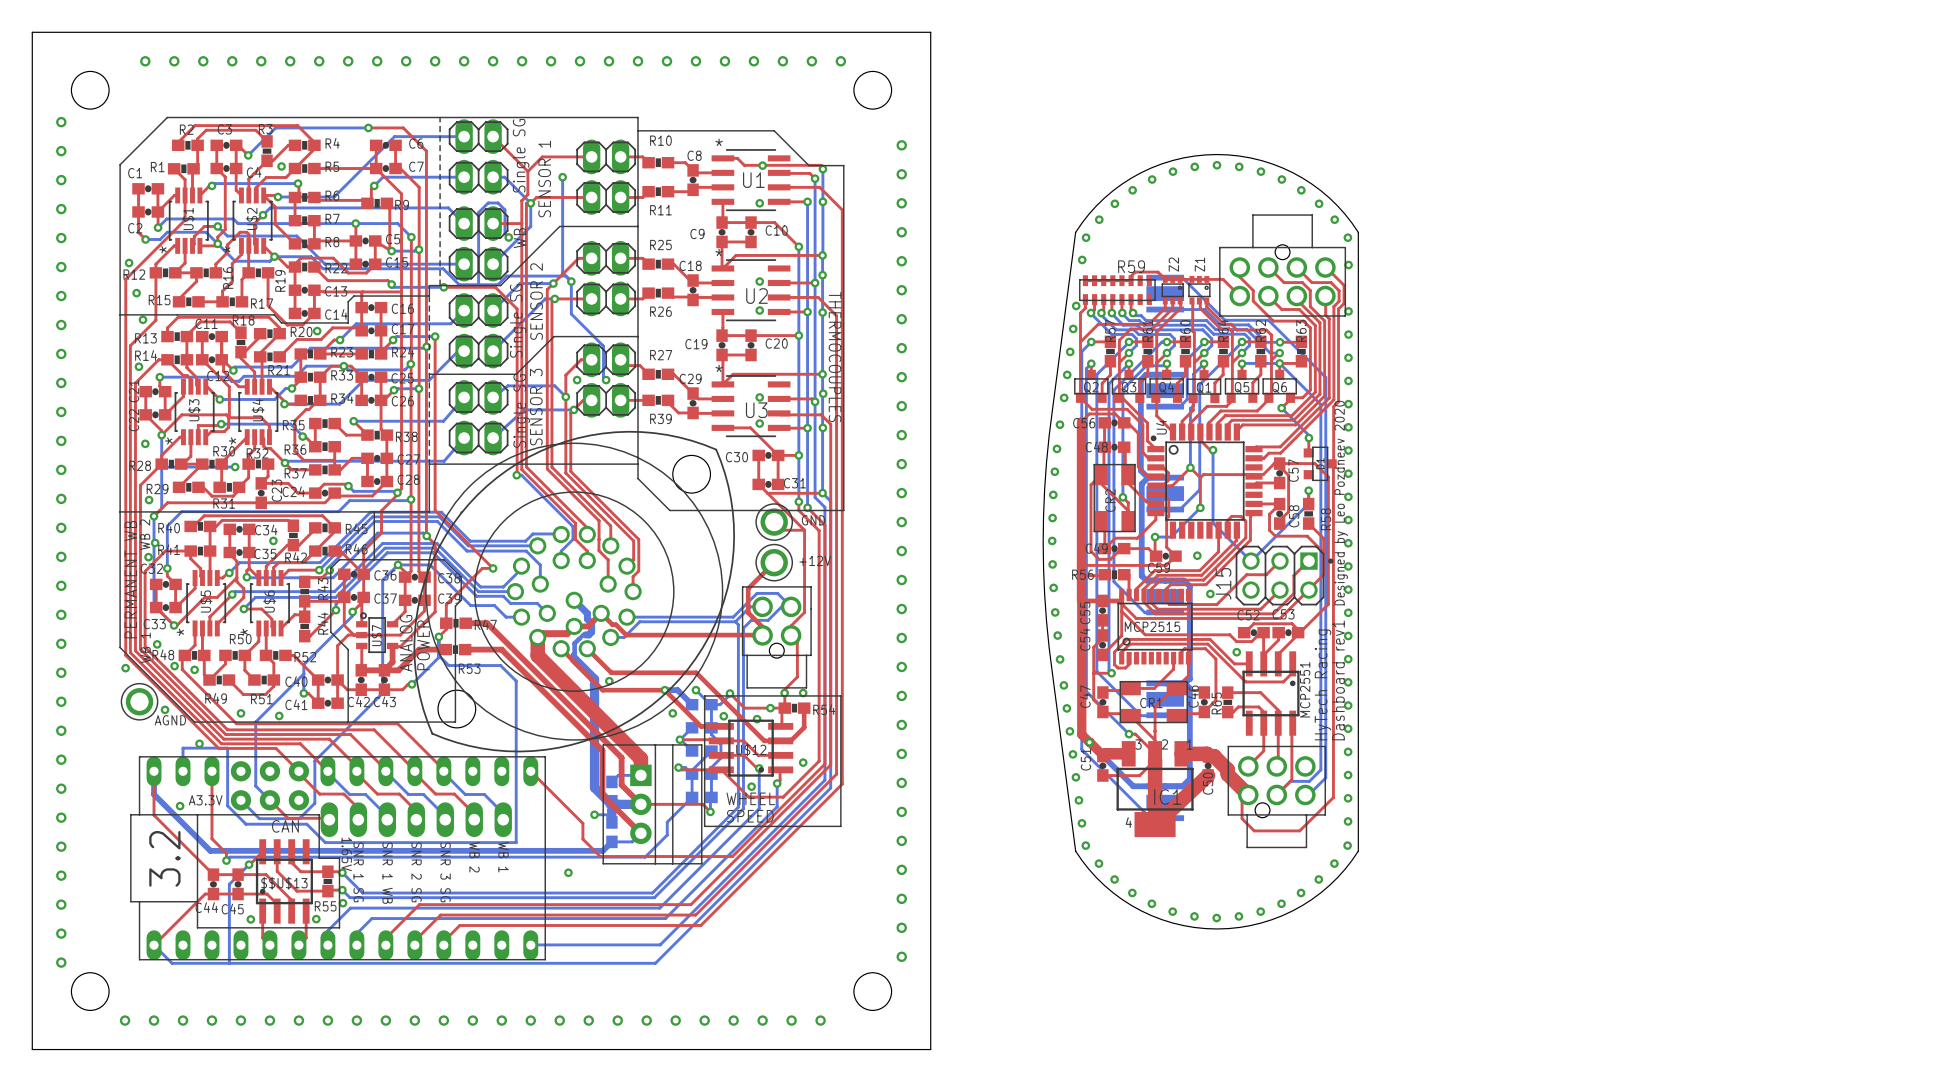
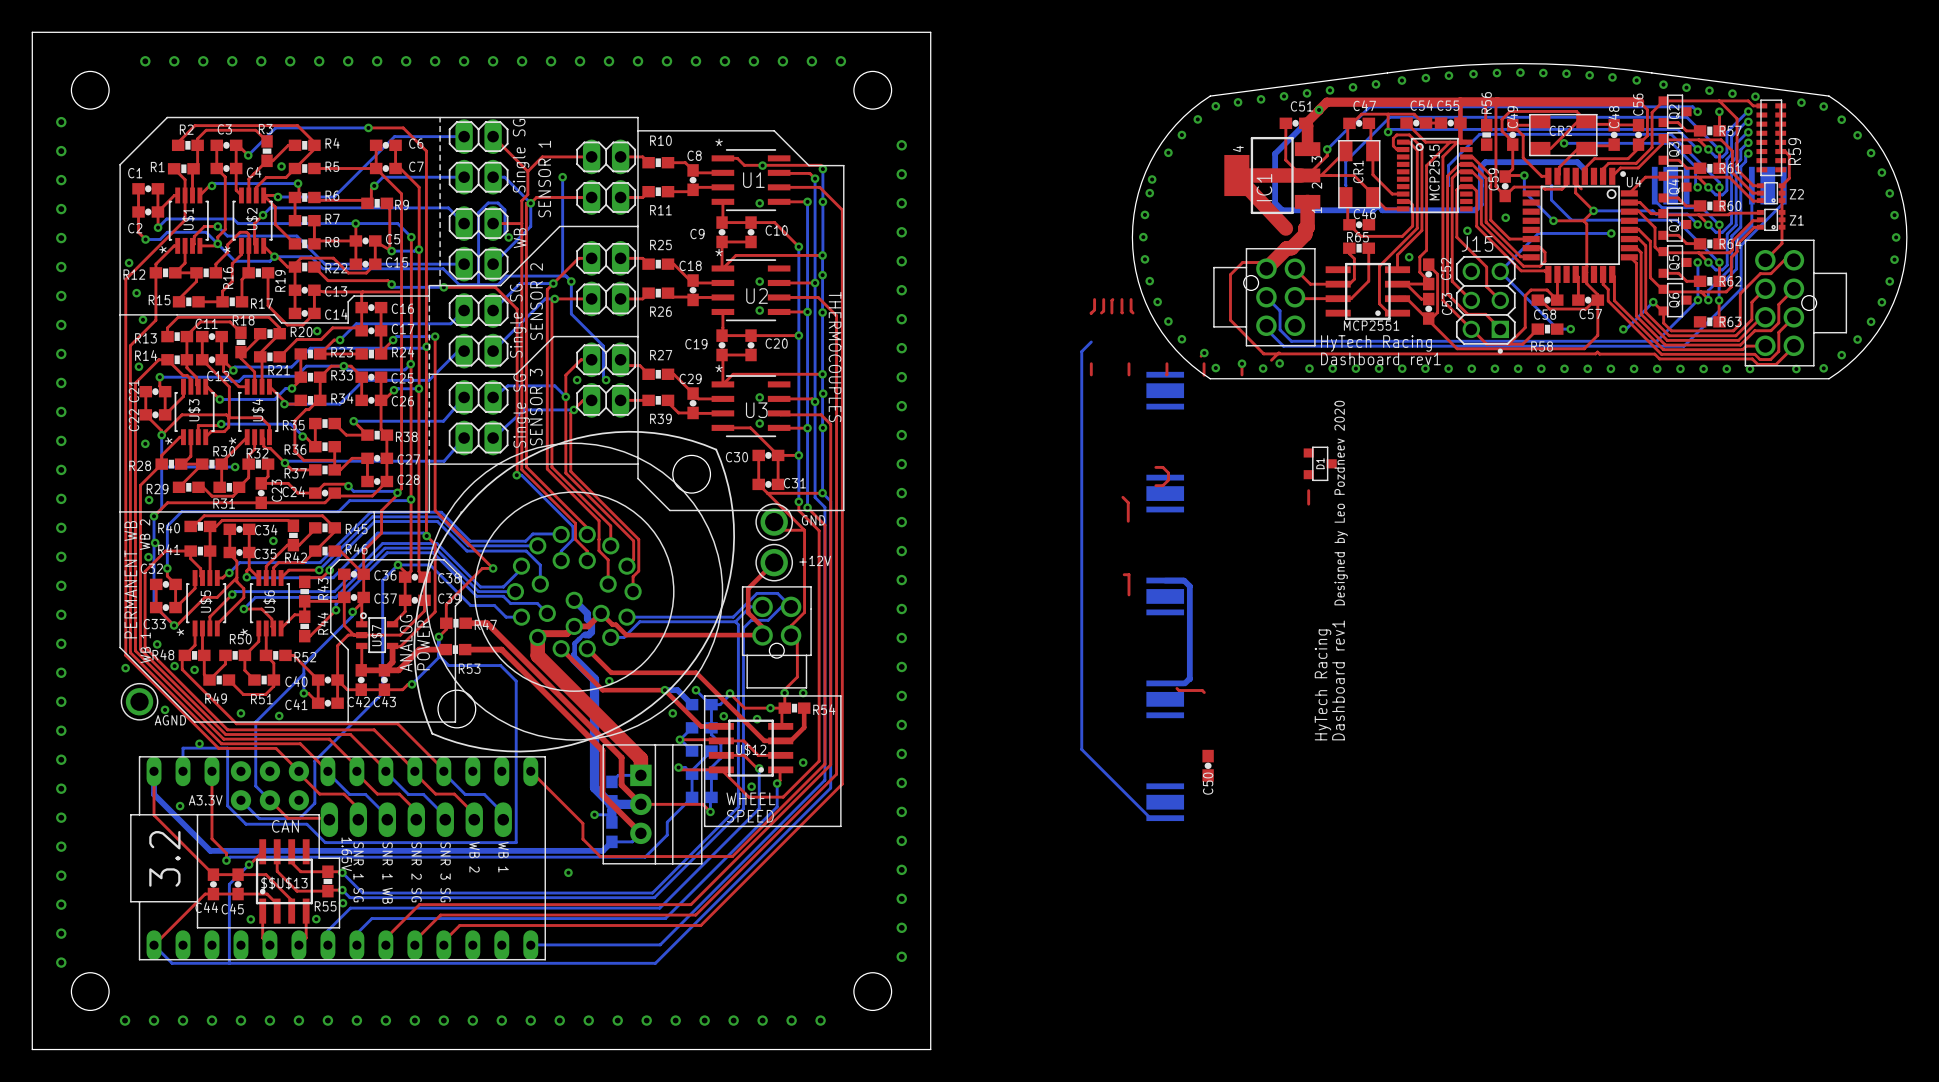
board edge: none -> (1387, 72) (1210, 96) (1183, 116) (1168, 133) (1155, 151) (1141, 182) (1133, 215) (1132, 248) (1135, 270) (1145, 302) (1162, 332) (1183, 358) (1210, 378) (1829, 378) (1847, 365) (1863, 349) (1877, 332) (1888, 313) (1900, 281) (1906, 248) (1906, 226) (1900, 193) (1888, 161) (1877, 142) (1855, 116) (1829, 96) (1625, 69) (1572, 65) (1493, 63) (1387, 72)
via: none -> (1520, 72)
via: none -> (1496, 73)
via: none -> (1543, 73)
via: none -> (1566, 73)
via: none -> (1473, 74)
via: none -> (1448, 75)
via: none -> (1589, 75)
via: none -> (1612, 77)
via: none -> (1425, 78)
via: none -> (1401, 80)
via: none -> (1636, 80)
via: none -> (1375, 84)
via: none -> (1663, 84)
via: none -> (1353, 87)
via: none -> (1686, 87)
via: none -> (1330, 90)
via: none -> (1709, 90)
via: none -> (1307, 93)
via: none -> (1732, 93)
via: none -> (1284, 96)
via: none -> (1755, 96)
via: none -> (1261, 99)
top track: none -> (1719, 100) (1737, 118) (1737, 169) (1753, 185) (1760, 185)
top track: none -> (1485, 101) (1486, 125)
top track: none -> (1497, 101) (1495, 186) (1505, 195) (1514, 187) (1561, 189) (1566, 184) (1566, 176)
via: none -> (1238, 102)
top track: none -> (1460, 102) (1326, 102) (1305, 123) (1307, 125) (1307, 149)
via: none -> (1801, 102)
top track: none -> (1761, 105) (1753, 105) (1748, 100) (1663, 100) (1652, 112) (1652, 147) (1636, 163) (1608, 163) (1603, 169) (1603, 176)
top track: none -> (1780, 105) (1780, 151) (1785, 151) (1789, 155) (1789, 178) (1781, 185) (1781, 243) (1765, 260)
via: none -> (1215, 106)
via: none -> (1823, 106)
bottom track: none -> (1318, 109) (1275, 153) (1275, 203) (1282, 210) (1373, 210) (1378, 205) (1382, 210) (1475, 210) (1480, 204) (1480, 185)
via: none -> (1319, 109)
bottom track: none -> (1697, 111) (1692, 106) (1369, 106) (1327, 149)
via: none -> (1697, 111)
top track: none -> (1719, 111) (1719, 130)
via: none -> (1719, 111)
bottom track: none -> (1748, 111) (1726, 132) (1726, 152) (1722, 156) (1715, 156) (1708, 149)
via: none -> (1748, 111)
top track: none -> (1388, 114) (1388, 132)
via: none -> (1197, 119)
top track: none -> (1502, 119) (1502, 131) (1512, 141) (1512, 169) (1505, 176)
top track: none -> (1502, 119) (1510, 111) (1576, 111) (1589, 124) (1638, 125)
via: none -> (1841, 119)
top track: none -> (1540, 121) (1536, 125) (1512, 125) (1523, 135) (1523, 157) (1541, 176) (1548, 176)
top track: none -> (1586, 121) (1577, 121) (1550, 148)
bottom track: none -> (1748, 121) (1731, 136) (1731, 154) (1726, 159) (1726, 190) (1722, 194) (1715, 194) (1708, 187)
via: none -> (1748, 121)
top track: none -> (1663, 122) (1678, 122) (1686, 130) (1700, 130)
top track: none -> (1285, 123) (1285, 160) (1301, 175) (1236, 175) (1285, 228)
top track: none -> (1368, 123) (1370, 125) (1370, 148) (1372, 151) (1372, 174) (1392, 194) (1403, 194)
top track: none -> (1406, 123) (1425, 142) (1466, 142) (1460, 142)
top track: none -> (1441, 123) (1423, 123) (1414, 114) (1361, 114) (1347, 127) (1347, 148) (1321, 175)
bottom track: none -> (1388, 132) (1390, 129) (1677, 129) (1697, 149)
via: none -> (1388, 132)
bottom track: none -> (1748, 132) (1736, 143) (1736, 157) (1731, 162) (1731, 223) (1722, 232) (1715, 232) (1708, 224)
via: none -> (1748, 132)
via: none -> (1181, 135)
via: none -> (1857, 135)
top track: none -> (1698, 139) (1708, 149)
top track: none -> (1403, 142) (1409, 142) (1417, 150) (1417, 228) (1379, 266) (1379, 303) (1388, 313) (1397, 313)
top track: none -> (1450, 142) (1426, 165) (1426, 250) (1419, 257) (1419, 272) (1428, 281) (1428, 284) (1397, 284)
top track: none -> (1457, 142) (1442, 156) (1442, 300) (1486, 344) (1522, 344) (1537, 329)
top track: none -> (1460, 142) (1460, 101) (1639, 101) (1647, 109) (1647, 135) (1638, 144) (1638, 148) (1628, 158) (1594, 158) (1584, 168) (1584, 176)
bottom track: none -> (1748, 142) (1740, 149) (1740, 159) (1736, 164) (1736, 225) (1727, 234) (1727, 265) (1722, 269) (1715, 269) (1708, 262)
via: none -> (1748, 142)
bottom track: none -> (1564, 143) (1672, 143) (1695, 166) (1695, 185) (1697, 187)
via: none -> (1564, 143)
top track: none -> (1614, 144) (1577, 148) (1559, 167) (1557, 176)
top track: none -> (1327, 149) (1327, 155) (1307, 175) (1321, 175)
via: none -> (1327, 149)
top track: none -> (1403, 149) (1396, 149) (1393, 145) (1393, 138) (1396, 134) (1409, 134) (1421, 147) (1421, 230) (1397, 254) (1397, 269)
via: none -> (1697, 149)
via: none -> (1708, 149)
top track: none -> (1719, 149) (1719, 168)
bottom track: none -> (1719, 149) (1686, 117) (1389, 117) (1345, 161) (1346, 185)
via: none -> (1719, 149)
via: none -> (1168, 152)
bottom track: none -> (1748, 153) (1745, 156) (1745, 161) (1740, 166) (1740, 227) (1731, 236) (1731, 267) (1708, 290) (1708, 300)
via: none -> (1748, 153)
via: none -> (1871, 153)
top track: none -> (1466, 156) (1472, 156) (1490, 175) (1490, 220) (1509, 239) (1531, 239)
top track: none -> (1663, 160) (1678, 160) (1686, 168) (1700, 168)
via: (1216, 165) -> none
via: (1194, 166) -> none
via: (1239, 166) -> none
bottom track: none -> (1583, 168) (1577, 162) (1485, 162) (1480, 166) (1480, 185)
via: (1172, 171) -> none
via: (1260, 171) -> none
via: none -> (1881, 172)
top track: none -> (1321, 175) (1329, 175)
top track: none -> (1330, 175) (1354, 175) (1385, 208) (1403, 208)
top track: none -> (1506, 175) (1524, 175)
bottom track: none -> (1524, 175) (1524, 191) (1553, 220)
via: none -> (1524, 175)
top track: none -> (1575, 176) (1575, 192) (1593, 210) (1583, 220)
top track: none -> (1612, 176) (1620, 167) (1638, 167) (1662, 143) (1663, 138) (1721, 139) (1732, 151) (1732, 172) (1753, 193) (1760, 193)
top track: none -> (1698, 177) (1708, 187)
via: (1281, 179) -> none
top track: none -> (1575, 183) (1581, 188)
bottom track: none -> (1449, 185) (1448, 165) (1479, 134) (1671, 134) (1719, 182) (1719, 187)
bottom track: none -> (1551, 185) (1551, 200) (1571, 220) (1676, 220) (1719, 262)
bottom track: none -> (1654, 185) (1654, 200) (1661, 207) (1701, 207) (1719, 224)
part: none -> (1670, 185)
bottom track: none -> (1751, 185) (1751, 225) (1736, 240) (1736, 269) (1719, 286) (1719, 300)
part: none -> (1767, 185)
bottom track: none -> (1783, 185) (1783, 202) (1741, 245) (1741, 289) (1683, 346) (1283, 346) (1266, 329) (1266, 325)
via: none -> (1697, 187)
via: none -> (1708, 187)
top track: none -> (1719, 187) (1719, 205)
via: none -> (1719, 187)
via: (1132, 190) -> none
via: (1301, 190) -> none
via: none -> (1149, 193)
top track: none -> (1629, 193) (1645, 177) (1729, 177) (1753, 201) (1760, 200)
part: none -> (1771, 193)
via: none -> (1889, 193)
text: none -> Z2 (1796, 194)
top track: none -> (1345, 197) (1347, 199) (1347, 223) (1361, 236) (1402, 236) (1412, 226) (1412, 205) (1409, 201) (1403, 201)
top track: none -> (1663, 197) (1678, 197) (1686, 205) (1700, 205)
top track: none -> (1307, 201) (1307, 227) (1305, 228) (1305, 234) (1291, 248) (1286, 248) (1266, 268) (1259, 262) (1242, 262) (1230, 274) (1230, 320) (1263, 353) (1595, 353) (1597, 352) (1599, 354) (1654, 354) (1659, 358) (1752, 358) (1757, 364) (1776, 364) (1793, 345)
top track: none -> (1629, 202) (1640, 202) (1651, 213) (1664, 214) (1728, 214) (1730, 213) (1760, 212)
via: (1114, 203) -> none
via: (1319, 203) -> none
bottom track: none -> (1593, 210) (1652, 210) (1656, 214) (1687, 214) (1697, 224)
via: none -> (1593, 210)
top track: none -> (1629, 211) (1638, 210) (1655, 227) (1655, 247) (1659, 251) (1664, 252) (1729, 252) (1732, 249) (1732, 241) (1752, 220) (1760, 219)
via: none -> (1144, 214)
top track: none -> (1698, 214) (1705, 221)
via: none -> (1894, 215)
via: none -> (1505, 217)
via: (1099, 219) -> none
via: (1334, 219) -> none
part: none -> (1771, 219)
top track: none -> (1553, 220) (1583, 220)
via: none -> (1553, 220)
top track: none -> (1583, 220) (1586, 223) (1586, 283) (1597, 294) (1597, 335) (1584, 348) (1457, 348) (1427, 319)
text: none -> Z1 (1796, 220)
via: none -> (1697, 224)
via: none -> (1708, 224)
top track: none -> (1719, 224) (1719, 243)
via: none -> (1719, 224)
top track: none -> (1760, 227) (1754, 227) (1737, 244) (1737, 251) (1731, 257) (1731, 286) (1726, 291) (1663, 291) (1663, 289) (1650, 277) (1650, 241) (1638, 229) (1629, 229)
via: none -> (1467, 230)
board edge: (1075, 232) (1049, 435) (1043, 541) (1049, 647) (1075, 851) (1096, 877) (1112, 892) (1131, 905) (1161, 919) (1183, 925) (1205, 928) (1228, 928) (1261, 922) (1292, 910) (1311, 899) (1337, 877) (1358, 851) (1358, 232) (1345, 214) (1329, 198) (1311, 184) (1292, 172) (1272, 163) (1250, 157) (1216, 154) (1194, 156) (1172, 160) (1141, 172) (1121, 184) (1104, 198) (1088, 214) (1075, 232) -> none
bottom track: none -> (1611, 233) (1538, 233) (1500, 271) (1557, 329) (1570, 329)
via: none -> (1611, 233)
top track: none -> (1663, 235) (1678, 235) (1686, 243) (1700, 243)
via: (1086, 237) -> none
via: none -> (1143, 237)
via: (1347, 237) -> none
via: none -> (1896, 237)
top track: none -> (1629, 239) (1638, 238) (1645, 245) (1645, 312) (1669, 335) (1735, 335) (1751, 319) (1751, 302) (1765, 288)
top track: none -> (1349, 248) (1349, 253) (1354, 258) (1354, 279) (1350, 283) (1310, 284) (1294, 268)
top track: none -> (1368, 248) (1368, 281) (1351, 298) (1294, 297)
top track: none -> (1531, 248) (1540, 247) (1545, 252) (1545, 261) (1540, 266) (1523, 266) (1481, 224) (1481, 180) (1472, 171) (1458, 171) (1452, 178) (1452, 281) (1471, 300)
top track: none -> (1629, 248) (1636, 247) (1641, 252) (1641, 314) (1667, 340) (1738, 340) (1761, 317) (1765, 317)
top track: none -> (1698, 252) (1708, 262)
via: none -> (1409, 257)
top track: none -> (1531, 257) (1520, 256) (1486, 222) (1486, 178) (1472, 164) (1459, 164) (1447, 176) (1447, 294) (1467, 314) (1485, 314) (1500, 329)
top track: none -> (1629, 257) (1636, 263) (1636, 316) (1665, 345) (1740, 345) (1754, 330) (1770, 330) (1778, 322) (1778, 304) (1793, 288)
via: (1082, 259) -> none
via: none -> (1144, 259)
via: none -> (1894, 259)
top track: none -> (1793, 260) (1784, 260) (1770, 273) (1760, 273) (1740, 293) (1740, 324) (1733, 330) (1671, 330) (1663, 323) (1663, 310) (1653, 302)
bottom track: none -> (1697, 262) (1697, 300) (1656, 341) (1291, 341) (1280, 329) (1280, 310) (1266, 297)
via: none -> (1697, 262)
via: none -> (1708, 262)
top track: none -> (1719, 262) (1719, 281)
via: none -> (1719, 262)
text: Z2 (1173, 264) -> none
text: Z1 (1199, 264) -> none
part: (1282, 265) -> none
via: (1348, 265) -> none
top track: none -> (1428, 265) (1437, 274) (1437, 312) (1431, 318) (1426, 318) (1405, 297) (1397, 298)
top track: (1239, 267) (1239, 277) (1253, 290) (1253, 301) (1273, 321) (1303, 321) (1310, 327) (1310, 390) (1302, 397) (1290, 397) (1281, 408) -> none
top track: (1268, 267) (1284, 282) (1302, 282) (1310, 290) (1310, 306) (1324, 320) (1324, 396) (1295, 424) (1242, 424) (1236, 432) -> none
top track: (1296, 267) (1311, 282) (1330, 282) (1339, 290) (1339, 301) (1333, 306) (1333, 399) (1280, 453) (1268, 453) (1263, 458) (1253, 458) -> none
top track: (1325, 267) (1344, 285) (1344, 303) (1338, 309) (1338, 401) (1333, 406) (1333, 461) (1331, 463) (1333, 465) (1333, 797) (1299, 830) (1254, 830) (1242, 818) (1242, 801) (1248, 794) (1227, 774) (1227, 769) (1214, 756) (1208, 756) (1207, 753) (1181, 753) -> none
top track: none -> (1663, 273) (1678, 273) (1686, 281) (1700, 281)
top track: none -> (1548, 274) (1544, 270) (1521, 270) (1476, 226) (1476, 191) (1472, 186) (1460, 186) (1456, 190) (1456, 237) (1486, 267) (1486, 286) (1500, 300)
top track: none -> (1557, 274) (1557, 299) (1547, 289) (1531, 289) (1525, 295) (1525, 327) (1508, 344)
top track: none -> (1575, 274) (1578, 277) (1578, 300)
top track: none -> (1603, 274) (1603, 284) (1608, 289) (1608, 301) (1661, 354) (1754, 354) (1760, 359) (1770, 359) (1778, 351) (1778, 332) (1793, 317)
top track: none -> (1612, 274) (1614, 276) (1614, 300) (1663, 349) (1742, 349) (1746, 346) (1765, 345)
bottom track: (1165, 277) (1182, 277) (1224, 320) (1268, 320) (1325, 377) (1325, 777) (1308, 794) (1305, 794) -> none
top track: (1085, 280) (1131, 280) (1131, 276) (1135, 272) (1158, 272) (1165, 279) (1223, 279) (1239, 296) -> none
via: none -> (1149, 281)
via: none -> (1889, 281)
top track: none -> (1397, 284) (1406, 284) (1421, 299) (1428, 299)
R59 rotation: 0° (1117, 290) -> 90° clockwise (1771, 137)
R59 position: (1117, 290) -> (1771, 137)
part: (1172, 290) -> none
part: (1199, 290) -> none
part: none -> (1367, 291)
top track: none -> (1701, 291) (1708, 300)
part: (1165, 293) -> none
top track: (1268, 296) (1281, 309) (1299, 309) (1315, 325) (1315, 392) (1291, 415) (1225, 415) (1217, 423) (1218, 432) -> none
top track: (1296, 296) (1296, 299) (1319, 322) (1319, 394) (1293, 420) (1232, 420) (1227, 424) (1227, 432) -> none
top track: (1325, 296) (1325, 315) (1329, 318) (1329, 397) (1280, 446) (1256, 446) (1253, 449) -> none
part: none -> (1264, 297)
top track: (1085, 299) (1085, 308) (1080, 313) (1080, 397) (1092, 409) (1127, 409) (1142, 425) (1142, 452) (1148, 458) (1155, 458) -> none
top track: none -> (1537, 300) (1540, 300) (1549, 309) (1586, 309) (1594, 300) (1597, 300)
via: none -> (1697, 300)
via: none -> (1708, 300)
top track: none -> (1719, 300) (1719, 321)
via: none -> (1719, 300)
via: none -> (1157, 301)
top track: (1165, 301) (1165, 307) (1148, 324) (1098, 324) (1080, 342) -> none
top track: (1172, 301) (1172, 308) (1152, 328) (1130, 328) (1119, 340) (1118, 397) (1123, 398) (1147, 423) (1147, 440) (1155, 449) -> none
top track: (1180, 301) (1180, 308) (1156, 332) (1156, 415) (1172, 432) -> none
top track: (1191, 301) (1192, 331) (1194, 332) (1194, 396) (1193, 410) (1182, 421) (1182, 432) -> none
top track: (1199, 301) (1200, 308) (1220, 328) (1229, 328) (1232, 331) (1232, 396) (1231, 401) (1226, 406) (1207, 406) (1190, 423) (1191, 432) -> none
top track: (1206, 301) (1206, 306) (1224, 324) (1231, 324) (1237, 330) (1266, 330) (1271, 335) (1271, 397) (1268, 397) (1257, 411) (1220, 411) (1208, 423) (1209, 432) -> none
bottom track: none -> (1653, 302) (1626, 329) (1623, 329)
via: none -> (1653, 302)
via: none -> (1881, 302)
part: none -> (1795, 303)
via: (1076, 305) -> none
bottom track: (1165, 309) (1205, 309) (1220, 324) (1248, 324) (1266, 342) (1279, 342) -> none
via: (1348, 311) -> none
bottom track: (1091, 313) (1111, 334) (1132, 334) (1136, 338) (1136, 345) (1128, 353) -> none
via: (1091, 313) -> none
bottom track: (1101, 313) (1116, 329) (1134, 329) (1138, 334) (1170, 334) (1174, 338) (1174, 345) (1166, 353) -> none
via: (1101, 313) -> none
bottom track: (1111, 313) (1123, 325) (1137, 325) (1142, 329) (1202, 329) (1211, 338) (1211, 345) (1204, 353) -> none
via: (1111, 313) -> none
bottom track: (1122, 313) (1129, 320) (1139, 320) (1143, 325) (1204, 325) (1213, 334) (1244, 334) (1249, 338) (1249, 345) (1242, 353) -> none
via: (1122, 313) -> none
bottom track: (1133, 313) (1135, 315) (1141, 315) (1146, 320) (1206, 320) (1215, 329) (1246, 329) (1270, 353) (1279, 353) -> none
via: (1133, 313) -> none
via: none -> (1168, 321)
via: none -> (1871, 321)
text: none -> MCP2551 (1371, 325)
via: (1073, 328) -> none
via: none -> (1570, 329)
via: none -> (1623, 329)
via: (1348, 334) -> none
via: none -> (1181, 339)
via: none -> (1857, 339)
top track: (1091, 341) (1110, 341) -> none
top track: (1129, 341) (1147, 341) -> none
top track: (1167, 341) (1185, 341) -> none
top track: (1204, 341) (1223, 341) -> none
top track: (1242, 341) (1260, 341) -> none
top track: (1301, 341) (1279, 342) -> none
via: (1091, 342) -> none
bottom track: (1128, 342) (1096, 374) (1096, 671) (1141, 715) (1165, 715) -> none
via: (1128, 342) -> none
bottom track: (1166, 342) (1162, 342) (1113, 390) (1113, 581) (1145, 612) (1165, 612) -> none
via: (1166, 342) -> none
bottom track: (1204, 342) (1187, 359) (1187, 399) (1179, 407) (1165, 406) -> none
via: (1204, 342) -> none
bottom track: (1242, 342) (1199, 384) (1199, 489) (1179, 509) (1165, 509) -> none
via: (1242, 342) -> none
via: (1279, 342) -> none
text: none -> HyTech Racing (1376, 343)
via: (1070, 351) -> none
R57 rotation: 0° (1110, 351) -> 90° clockwise (1709, 130)
R57 position: (1110, 351) -> (1709, 130)
R61 rotation: 0° (1147, 351) -> 90° clockwise (1709, 168)
R61 position: (1147, 351) -> (1709, 168)
R60 rotation: 0° (1185, 351) -> 90° clockwise (1709, 205)
R60 position: (1185, 351) -> (1709, 205)
R64 rotation: 0° (1223, 351) -> 90° clockwise (1709, 243)
R64 position: (1223, 351) -> (1709, 243)
R62 rotation: 0° (1260, 351) -> 90° clockwise (1709, 281)
R62 position: (1260, 351) -> (1709, 281)
R63 rotation: 0° (1301, 351) -> 90° clockwise (1709, 321)
R63 position: (1301, 351) -> (1709, 321)
top track: (1128, 353) (1119, 362) -> none
via: (1128, 353) -> none
top track: (1166, 353) (1156, 363) -> none
via: (1166, 353) -> none
top track: (1242, 353) (1232, 362) -> none
via: (1242, 353) -> none
via: (1279, 353) -> none
via: none -> (1841, 355)
top track: (1200, 356) (1194, 362) -> none
via: (1348, 357) -> none
text: none -> Dashboard rev1 (1380, 358)
top track: (1110, 361) (1110, 375) (1102, 383) (1102, 397) -> none
top track: (1147, 361) (1147, 374) (1139, 382) (1139, 397) -> none
top track: (1185, 361) (1185, 375) (1177, 383) (1177, 397) -> none
top track: (1223, 361) (1223, 374) (1214, 383) (1214, 398) -> none
top track: (1260, 361) (1260, 374) (1252, 382) (1252, 397) -> none
top track: (1301, 361) (1299, 363) (1279, 363) (1279, 374) -> none
bottom track: (1091, 363) (1086, 368) (1086, 691) (1128, 734) -> none
via: (1091, 363) -> none
bottom track: (1128, 363) (1108, 383) (1108, 670) (1111, 673) -> none
via: (1128, 363) -> none
bottom track: (1166, 363) (1164, 365) (1146, 365) (1122, 389) (1122, 497) -> none
via: (1166, 363) -> none
bottom track: (1204, 363) (1193, 374) (1193, 405) (1190, 408) (1190, 467) -> none
via position: (1204, 363) -> (1215, 368)
bottom track: (1242, 363) (1279, 363) (1320, 404) (1320, 769) (1309, 781) (1290, 781) (1276, 794) -> none
via: none -> (1263, 368)
via: none -> (1309, 368)
via: none -> (1332, 368)
via: none -> (1355, 368)
via: none -> (1379, 368)
via: none -> (1402, 368)
via: none -> (1425, 368)
via: none -> (1448, 368)
via: none -> (1471, 368)
via: none -> (1494, 368)
via: none -> (1518, 368)
via: none -> (1541, 368)
via: none -> (1564, 368)
via: none -> (1587, 368)
via: none -> (1610, 368)
via: none -> (1634, 368)
via: none -> (1657, 368)
via: none -> (1680, 368)
via: none -> (1703, 368)
via: none -> (1726, 368)
via: none -> (1750, 368)
via: none -> (1823, 368)
via: none -> (1796, 369)
via: (1067, 374) -> none
bottom track: (1165, 374) (1146, 374) (1140, 379) (1140, 470) (1147, 477) (1165, 477) -> none
via: (1348, 380) -> none
Q2 rotation: 0° (1091, 386) -> 90° clockwise (1675, 111)
Q2 position: (1091, 386) -> (1675, 111)
Q3 rotation: 0° (1128, 386) -> 90° clockwise (1675, 149)
Q3 position: (1128, 386) -> (1675, 149)
Q4 rotation: 0° (1166, 386) -> 90° clockwise (1675, 187)
Q4 position: (1166, 386) -> (1675, 187)
Q1 rotation: 0° (1204, 386) -> 90° clockwise (1674, 224)
Q1 position: (1204, 386) -> (1674, 224)
Q5 rotation: 0° (1242, 386) -> 90° clockwise (1675, 262)
Q5 position: (1242, 386) -> (1675, 262)
Q6 rotation: 0° (1279, 386) -> 90° clockwise (1675, 300)
Q6 position: (1279, 386) -> (1675, 300)
via: (1064, 397) -> none
via: (1348, 404) -> none
bottom track: (1281, 408) (1308, 435) (1308, 438) -> none
via: (1281, 408) -> none
top track: (1104, 422) (1103, 471) (1091, 484) (1091, 551) (1098, 559) -> none
C56 rotation: 0° (1114, 422) -> 90° clockwise (1638, 134)
C56 position: (1114, 422) -> (1638, 134)
via: (1059, 424) -> none
via: (1348, 427) -> none
top track: (1200, 432) (1200, 440) (1210, 450) (1213, 450) -> none
top track: (1308, 438) (1308, 452) -> none
via: (1308, 438) -> none
C48 rotation: 0° (1114, 447) -> 90° clockwise (1614, 134)
C48 position: (1114, 447) -> (1614, 134)
top track: (1124, 447) (1128, 483) (1146, 501) (1155, 503) -> none
via: (1056, 448) -> none
bottom track: (1213, 450) (1213, 523) (1251, 561) (1308, 503) (1308, 490) -> none
via: (1213, 450) -> none
via: (1348, 450) -> none
top track: (1279, 463) (1279, 466) (1288, 475) (1288, 511) (1279, 520) (1279, 523) -> none
via: (1190, 467) -> none
via: (1054, 471) -> none
C57 rotation: 0° (1279, 473) -> 90° clockwise (1588, 300)
C57 position: (1279, 473) -> (1588, 300)
via: (1348, 473) -> none
top track: (1101, 474) (1101, 483) (1128, 510) -> none
top track: (1155, 476) (1148, 476) (1138, 466) (1138, 433) (1127, 422) (1124, 422) (1115, 413) (1089, 413) (1081, 421) (1081, 600) (1121, 600) -> none
bottom track: (1148, 477) (1141, 484) (1141, 575) (1146, 580) (1165, 580) -> none
top track: (1200, 477) (1190, 467) (1172, 485) (1155, 485) -> none
top track: (1200, 477) (1200, 507) -> none
top track: (1200, 477) (1203, 474) (1263, 474) (1274, 463) (1314, 463) (1328, 477) (1328, 604) (1299, 633) -> none
U4 rotation: 0° (1204, 481) -> 90° clockwise (1580, 225)
U4 position: (1204, 481) -> (1580, 225)
top track: (1279, 482) (1256, 482) (1253, 485) -> none
via: (1308, 490) -> none
via: (1053, 494) -> none
top track: (1155, 494) (1164, 494) (1168, 499) (1166, 547) (1175, 556) (1166, 565) (1081, 564) -> none
via: (1348, 496) -> none
via: (1122, 497) -> none
CR2 rotation: 0° (1114, 498) -> 90° clockwise (1563, 135)
CR2 position: (1114, 498) -> (1563, 135)
top track: (1253, 503) (1279, 503) (1269, 514) (1269, 530) (1275, 536) (1307, 536) (1323, 552) -> none
bottom track: (1200, 507) (1171, 537) (1155, 537) -> none
via: (1200, 507) -> none
top track: (1155, 513) (1155, 519) (1137, 538) (1115, 538) (1104, 548) (1104, 525) (1101, 521) -> none
top track: (1253, 513) (1250, 516) (1250, 540) (1205, 584) (1170, 584) (1166, 588) (1166, 601) (1169, 604) (1216, 604) (1246, 574) (1266, 574) (1279, 561) -> none
C58 rotation: 0° (1279, 513) -> 90° clockwise (1547, 300)
C58 position: (1279, 513) -> (1547, 300)
R58 rotation: 0° (1308, 513) -> 90° clockwise (1547, 329)
R58 position: (1308, 513) -> (1547, 329)
via: (1052, 518) -> none
via: (1348, 520) -> none
top track: (1308, 523) (1323, 538) (1323, 574) (1280, 618) (1136, 618) (1121, 603) -> none
top track: (1218, 530) (1218, 551) (1199, 570) (1154, 570) (1136, 588) (1136, 595) -> none
top track: (1227, 530) (1227, 520) (1231, 516) (1241, 516) (1245, 521) (1245, 537) (1203, 580) (1160, 580) (1151, 589) (1151, 602) (1157, 609) (1260, 609) (1279, 590) -> none
top track: (1236, 530) (1236, 540) (1201, 575) (1157, 575) (1143, 589) (1143, 602) (1155, 613) (1273, 613) (1293, 593) (1293, 575) (1308, 561) -> none
top track: (1155, 537) (1155, 555) -> none
via: (1155, 537) -> none
via: (1052, 540) -> none
via: (1348, 543) -> none
C49 rotation: 0° (1114, 548) -> 90° clockwise (1512, 134)
C49 position: (1114, 548) -> (1512, 134)
via: (1197, 555) -> none
top track: (1156, 556) (1148, 548) (1121, 548) (1110, 559) (1098, 559) -> none
C59 rotation: 0° (1165, 556) -> 90° clockwise (1505, 186)
C59 position: (1165, 556) -> (1505, 186)
via: (1052, 564) -> none
via: (1348, 566) -> none
top track: (1104, 574) (1081, 575) -> none
R56 rotation: 0° (1114, 574) -> 90° clockwise (1486, 134)
R56 position: (1114, 574) -> (1486, 134)
J15 rotation: 0° (1284, 575) -> 90° clockwise (1485, 304)
J15 position: (1284, 575) -> (1485, 304)
via: (1053, 587) -> none
via: (1348, 589) -> none
via: (1210, 593) -> none
top track: (1081, 600) (1081, 734) (1102, 756) (1105, 753) (1128, 753) -> none
top track: (1121, 600) (1121, 595) (1121, 635) (1102, 654) -> none
C55 rotation: 0° (1102, 610) -> 90° clockwise (1450, 123)
C55 position: (1102, 610) -> (1450, 123)
top track: (1121, 611) (1145, 634) (1229, 634) (1236, 641) (1251, 641) (1260, 632) (1263, 632) (1263, 663) -> none
via: (1055, 612) -> none
via: (1348, 612) -> none
top track: (1102, 620) (1102, 638) (1093, 647) (1093, 699) (1107, 713) (1128, 713) (1155, 740) -> none
MCP2515 rotation: 0° (1155, 626) -> 90° clockwise (1434, 175)
MCP2515 position: (1155, 626) -> (1434, 175)
top track: (1244, 632) (1253, 623) (1292, 623) (1298, 629) (1298, 634) (1276, 655) (1278, 663) -> none
C52 rotation: 0° (1253, 632) -> 90° clockwise (1428, 274)
C52 position: (1253, 632) -> (1428, 274)
top track: (1278, 632) (1278, 640) (1263, 654) (1263, 663) -> none
C53 rotation: 0° (1288, 632) -> 90° clockwise (1428, 308)
C53 position: (1288, 632) -> (1428, 308)
via: (1057, 635) -> none
via: (1348, 635) -> none
C54 rotation: 0° (1102, 645) -> 90° clockwise (1416, 123)
C54 position: (1102, 645) -> (1416, 123)
via: (1236, 652) -> none
top track: (1121, 658) (1121, 652) (1129, 644) (1207, 644) (1245, 681) (1283, 681) (1292, 672) (1292, 663) -> none
top track: (1129, 658) (1129, 664) (1125, 668) (1117, 668) (1114, 664) (1114, 652) (1127, 639) (1210, 639) (1234, 663) (1249, 663) -> none
top track: (1173, 658) (1173, 669) (1154, 688) (1130, 688) (1128, 690) (1104, 690) (1102, 692) -> none
top track: (1180, 658) (1180, 652) (1184, 648) (1205, 648) (1215, 659) (1215, 700) (1202, 713) (1178, 713) (1176, 715) -> none
top track: (1188, 658) (1188, 675) (1155, 707) (1155, 731) -> none
via: (1060, 659) -> none
via: (1348, 659) -> none
top track: (1093, 673) (1111, 673) -> none
via: (1111, 673) -> none
via: (1348, 682) -> none
bottom track: (1165, 683) (1184, 683) (1189, 688) (1189, 779) (1182, 786) (1133, 786) (1089, 742) -> none
via: (1063, 685) -> none
text: MCP2551 (1305, 689) -> none
top track: (1227, 692) (1260, 692) (1278, 710) (1276, 766) -> none
part: (1271, 693) -> none
C47 rotation: 0° (1102, 702) -> 90° clockwise (1359, 123)
C47 position: (1102, 702) -> (1359, 123)
CR1 rotation: 0° (1153, 702) -> 90° clockwise (1359, 174)
CR1 position: (1153, 702) -> (1359, 174)
C46 rotation: 0° (1204, 702) -> 90° clockwise (1359, 224)
C46 position: (1204, 702) -> (1359, 224)
R65 rotation: 0° (1227, 702) -> 90° clockwise (1359, 248)
R65 position: (1227, 702) -> (1359, 248)
via: (1348, 705) -> none
via: (1066, 708) -> none
top track: (1227, 712) (1233, 712) (1238, 706) (1258, 706) (1263, 711) (1263, 750) (1248, 766) -> none
top track: (1292, 723) (1291, 779) (1276, 794) -> none
via: (1348, 728) -> none
via: (1069, 731) -> none
top track: (1155, 731) (1155, 740) -> none
top track: (1128, 734) (1135, 734) (1155, 753) (1155, 740) -> none
via: (1128, 734) -> none
IC1 footprint: [1116, 741, 1194, 838] -> [1224, 136, 1321, 215]
via: (1089, 742) -> none
via: (1348, 751) -> none
via: (1072, 754) -> none
C51 rotation: 0° (1102, 765) -> 90° clockwise (1295, 123)
C51 position: (1102, 765) -> (1295, 123)
top track: (1102, 775) (1139, 775) (1155, 760) (1155, 824) (1208, 775) -> none
via: (1348, 775) -> none
via: (1075, 777) -> none
part: (1276, 796) -> none
via: (1348, 798) -> none
via: (1078, 800) -> none
via: (1348, 821) -> none
via: (1081, 823) -> none
via: (1085, 845) -> none
via: (1347, 845) -> none
via: (1098, 863) -> none
via: (1334, 863) -> none
via: (1114, 879) -> none
via: (1318, 879) -> none
via: (1132, 892) -> none
via: (1301, 892) -> none
via: (1151, 903) -> none
via: (1281, 903) -> none
via: (1172, 911) -> none
via: (1260, 911) -> none
via: (1194, 916) -> none
via: (1238, 916) -> none
via: (1216, 918) -> none

